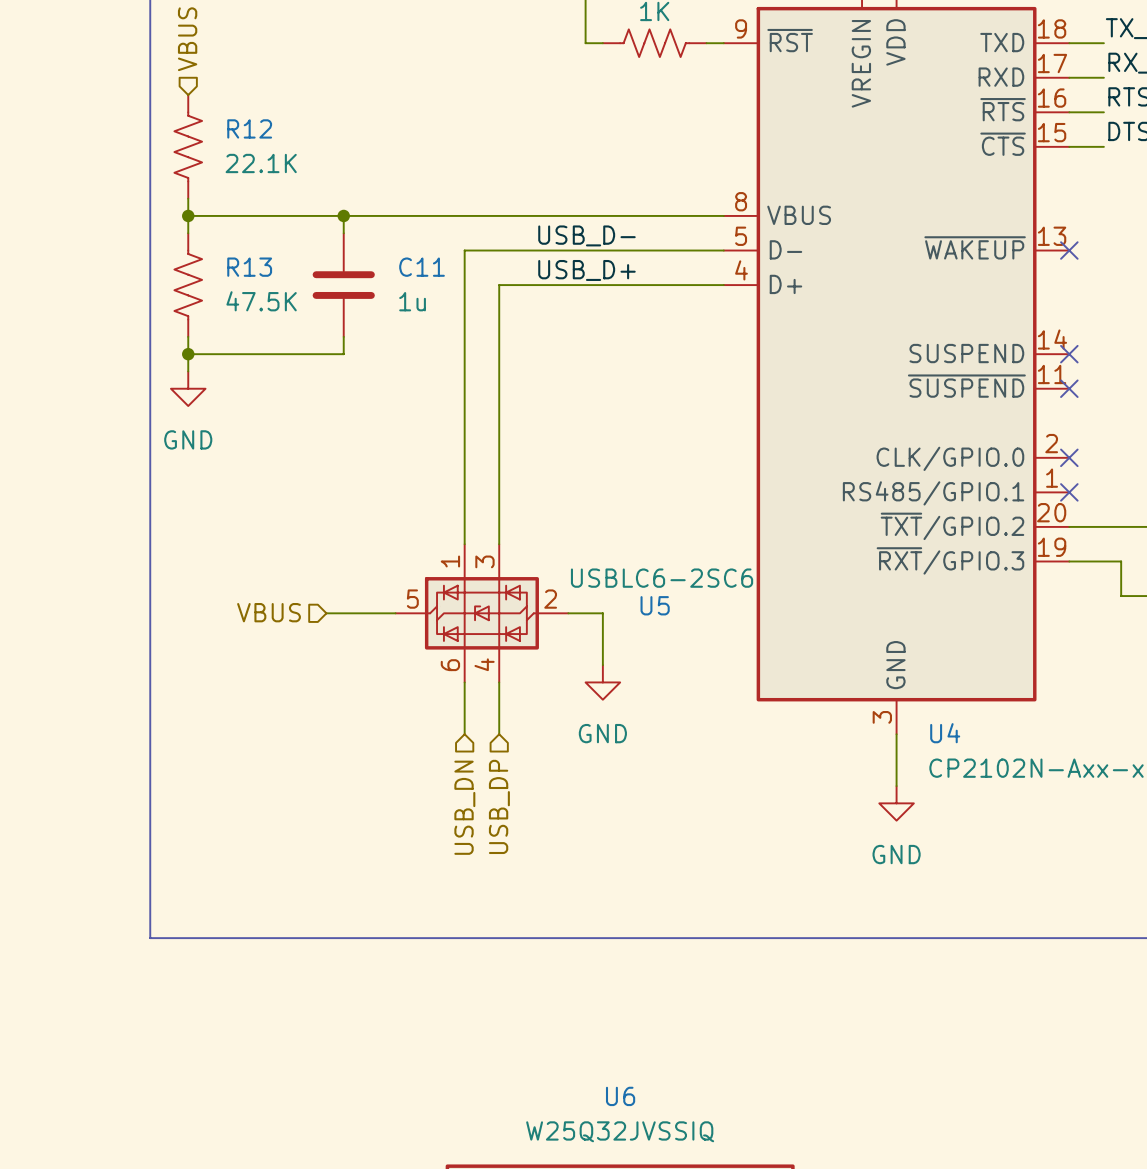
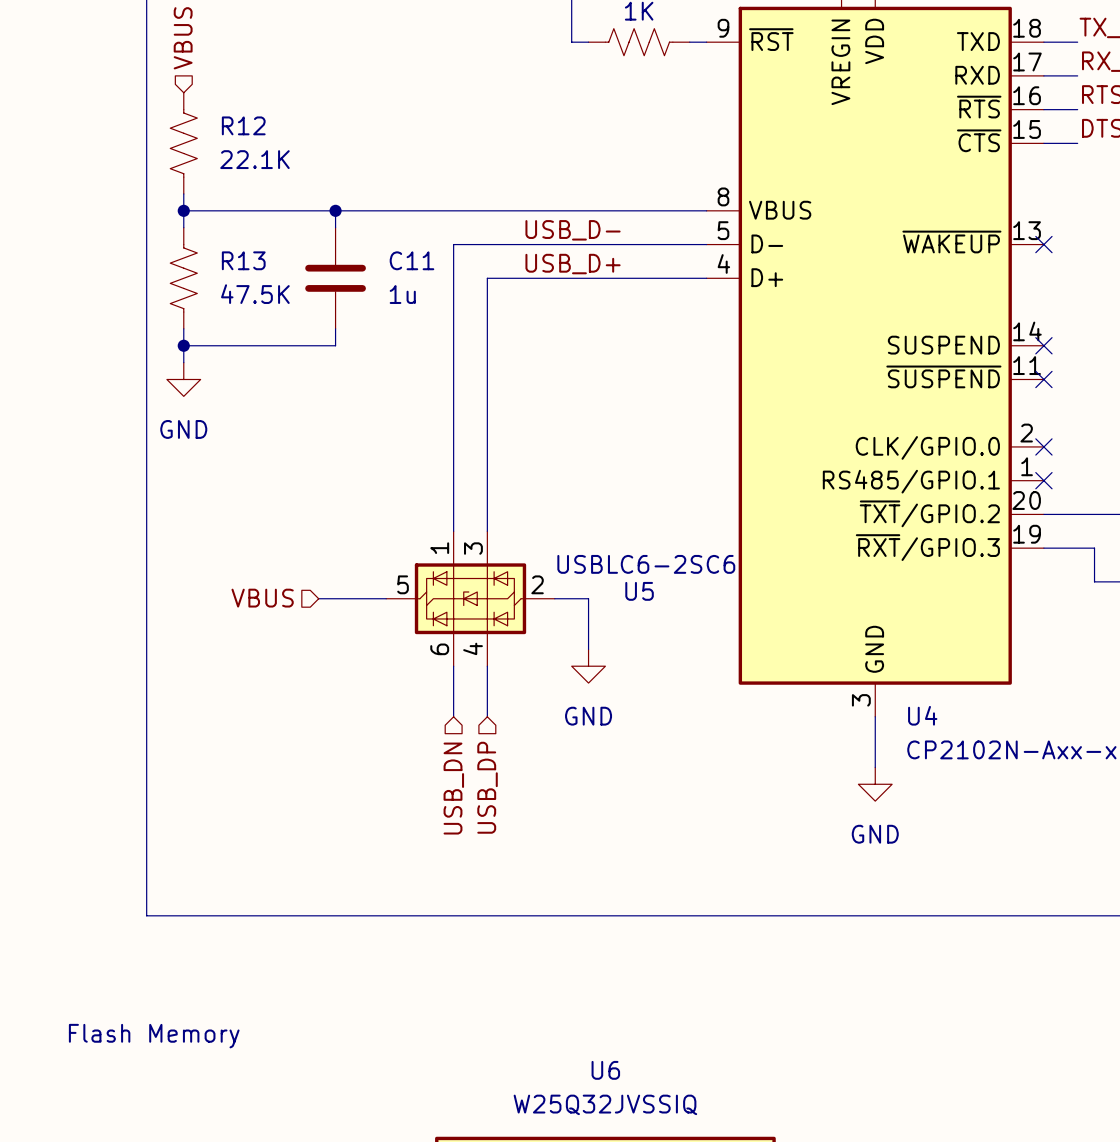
text: none -> Flash Memory (154, 1036)

